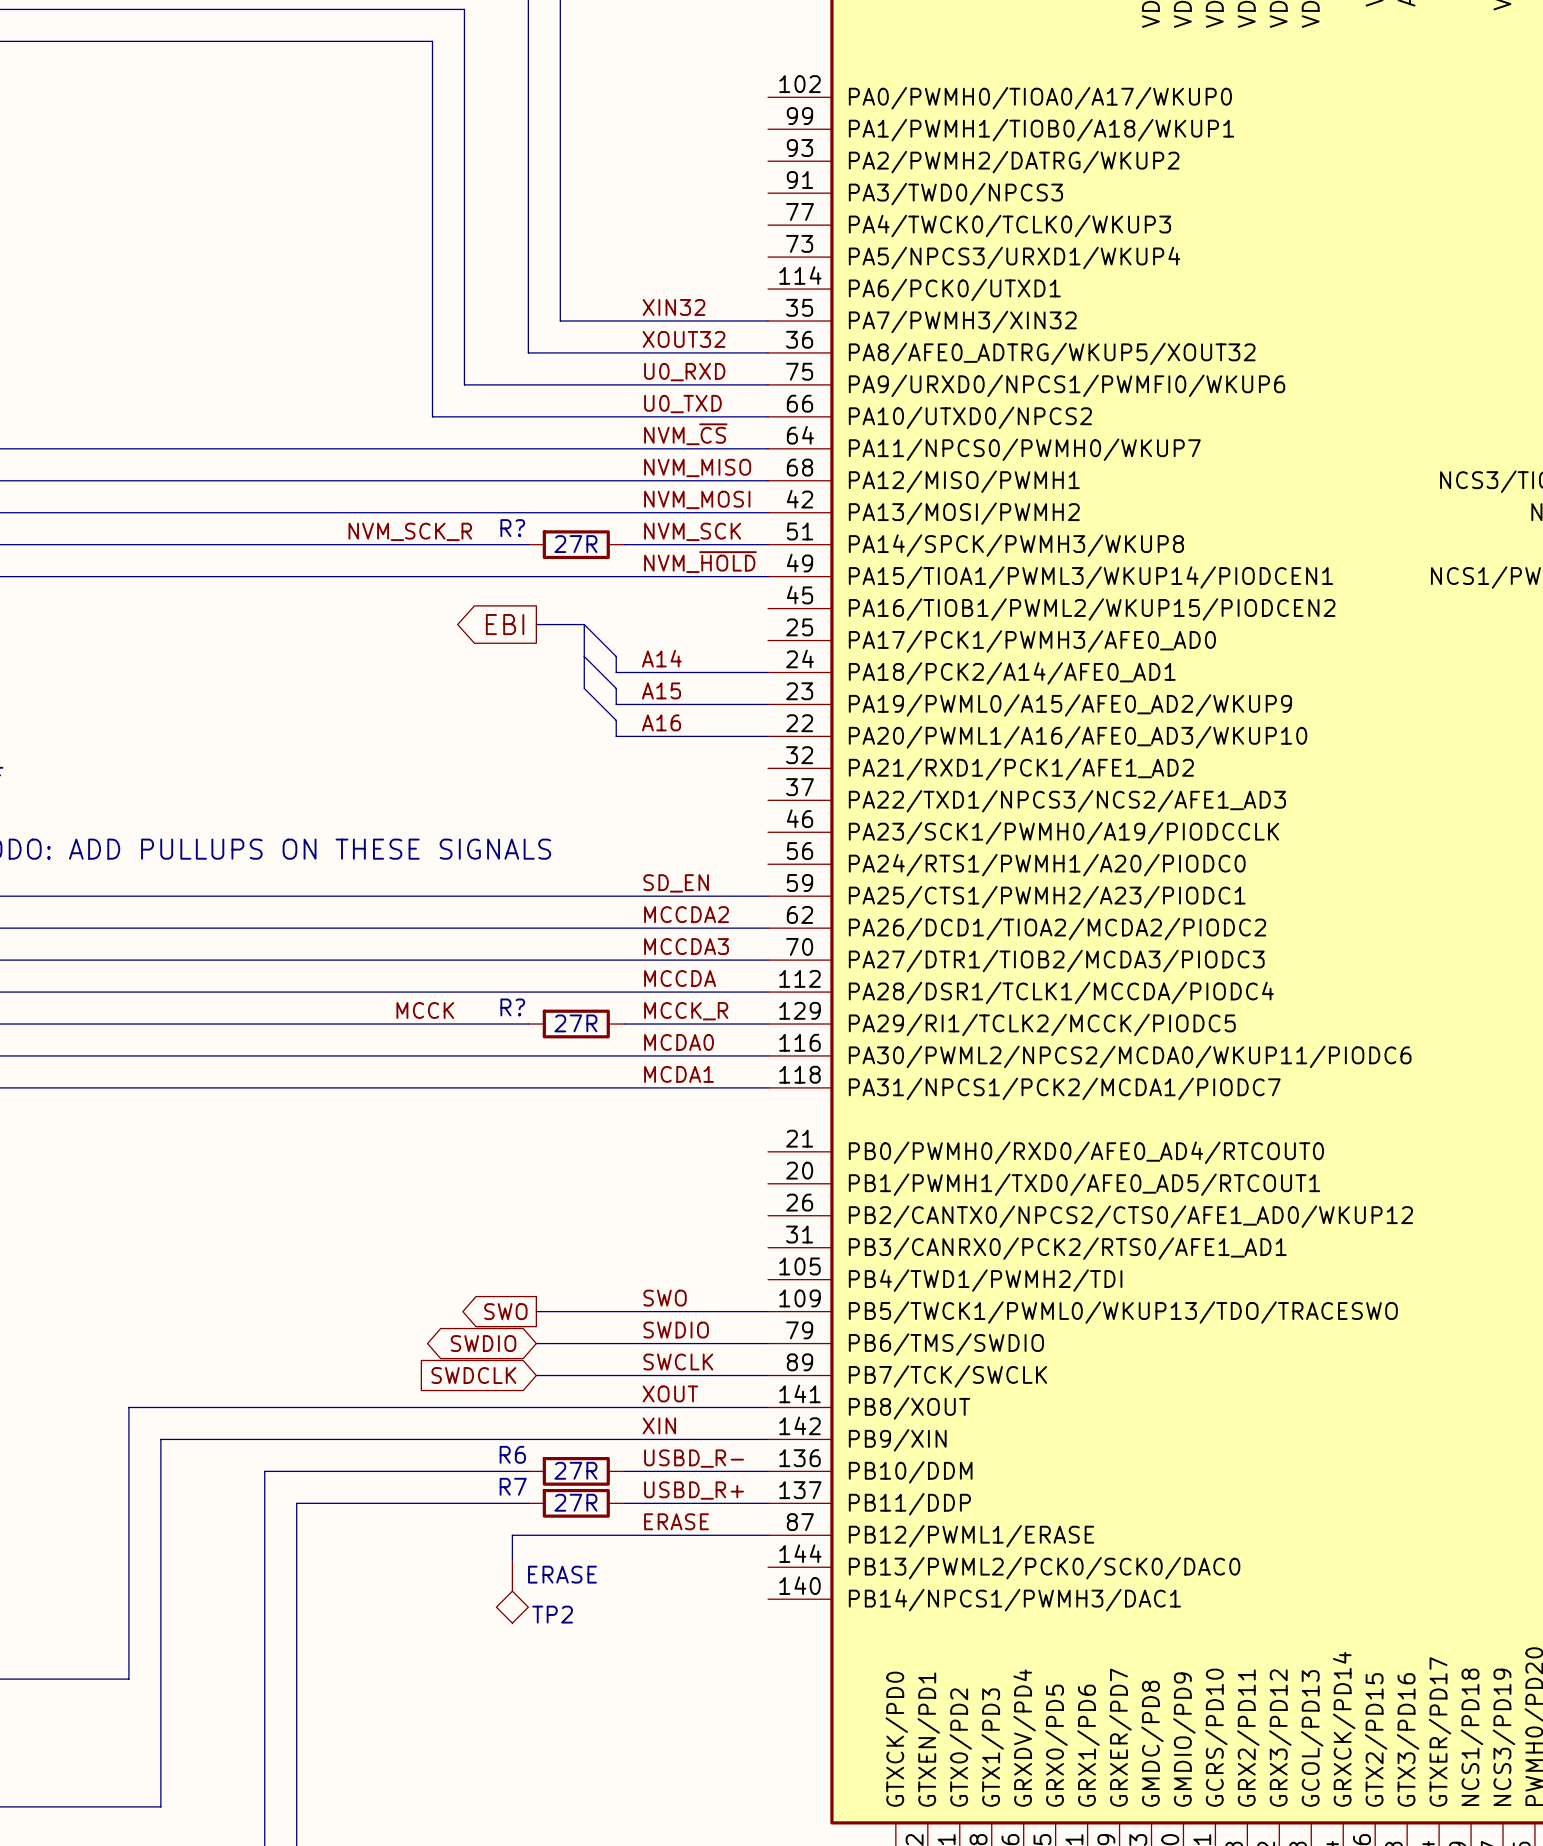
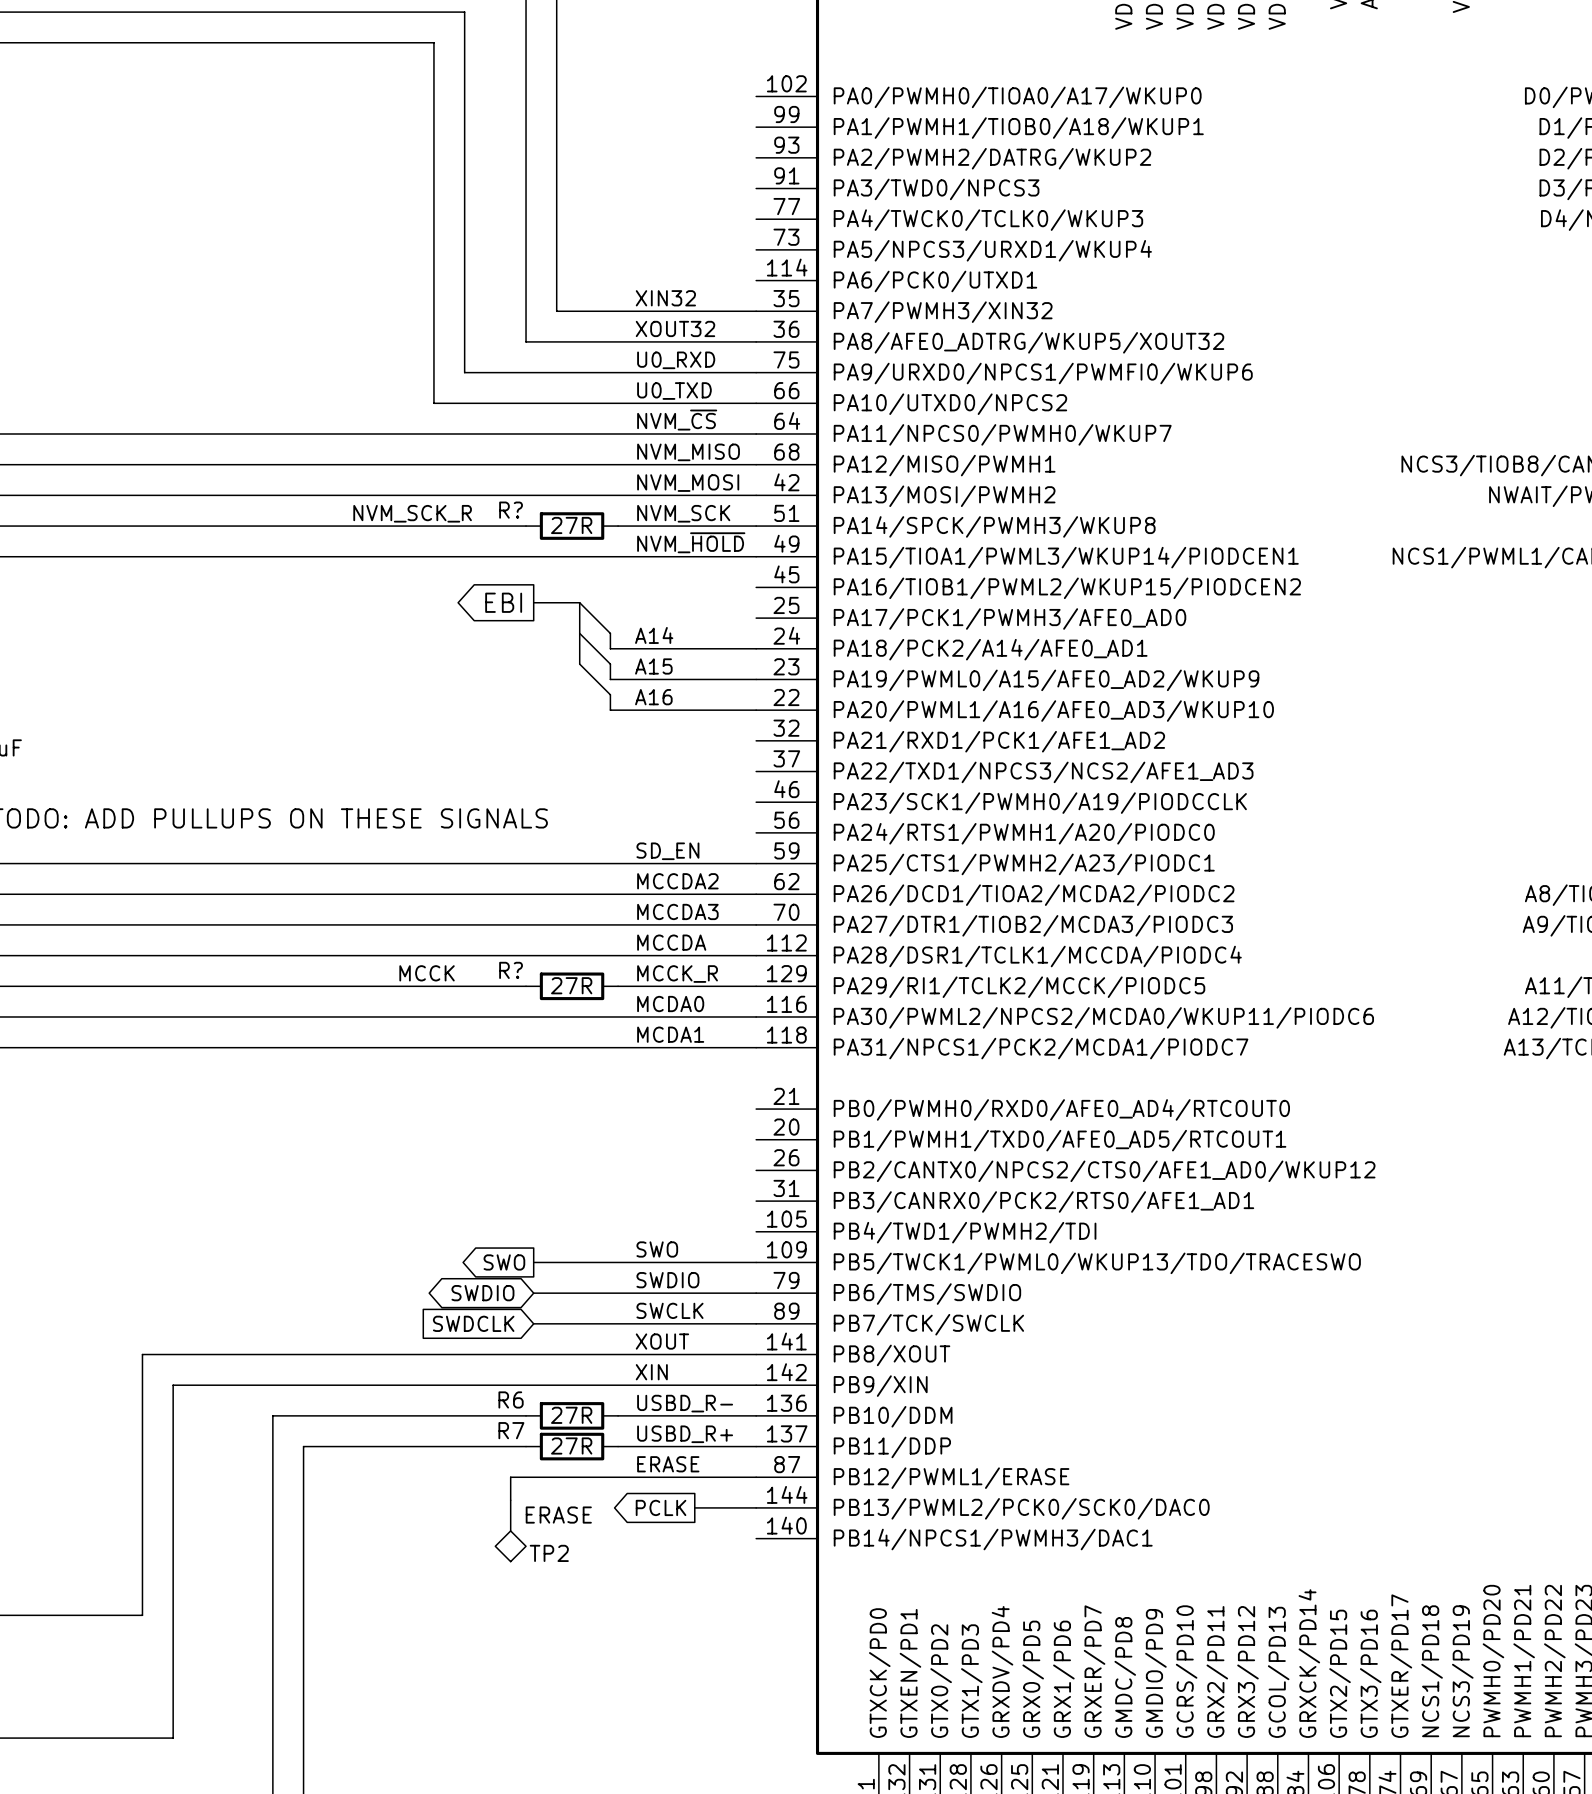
global label: none -> PCLK (661, 1507)
wire: none -> (694, 1507) (756, 1507)

